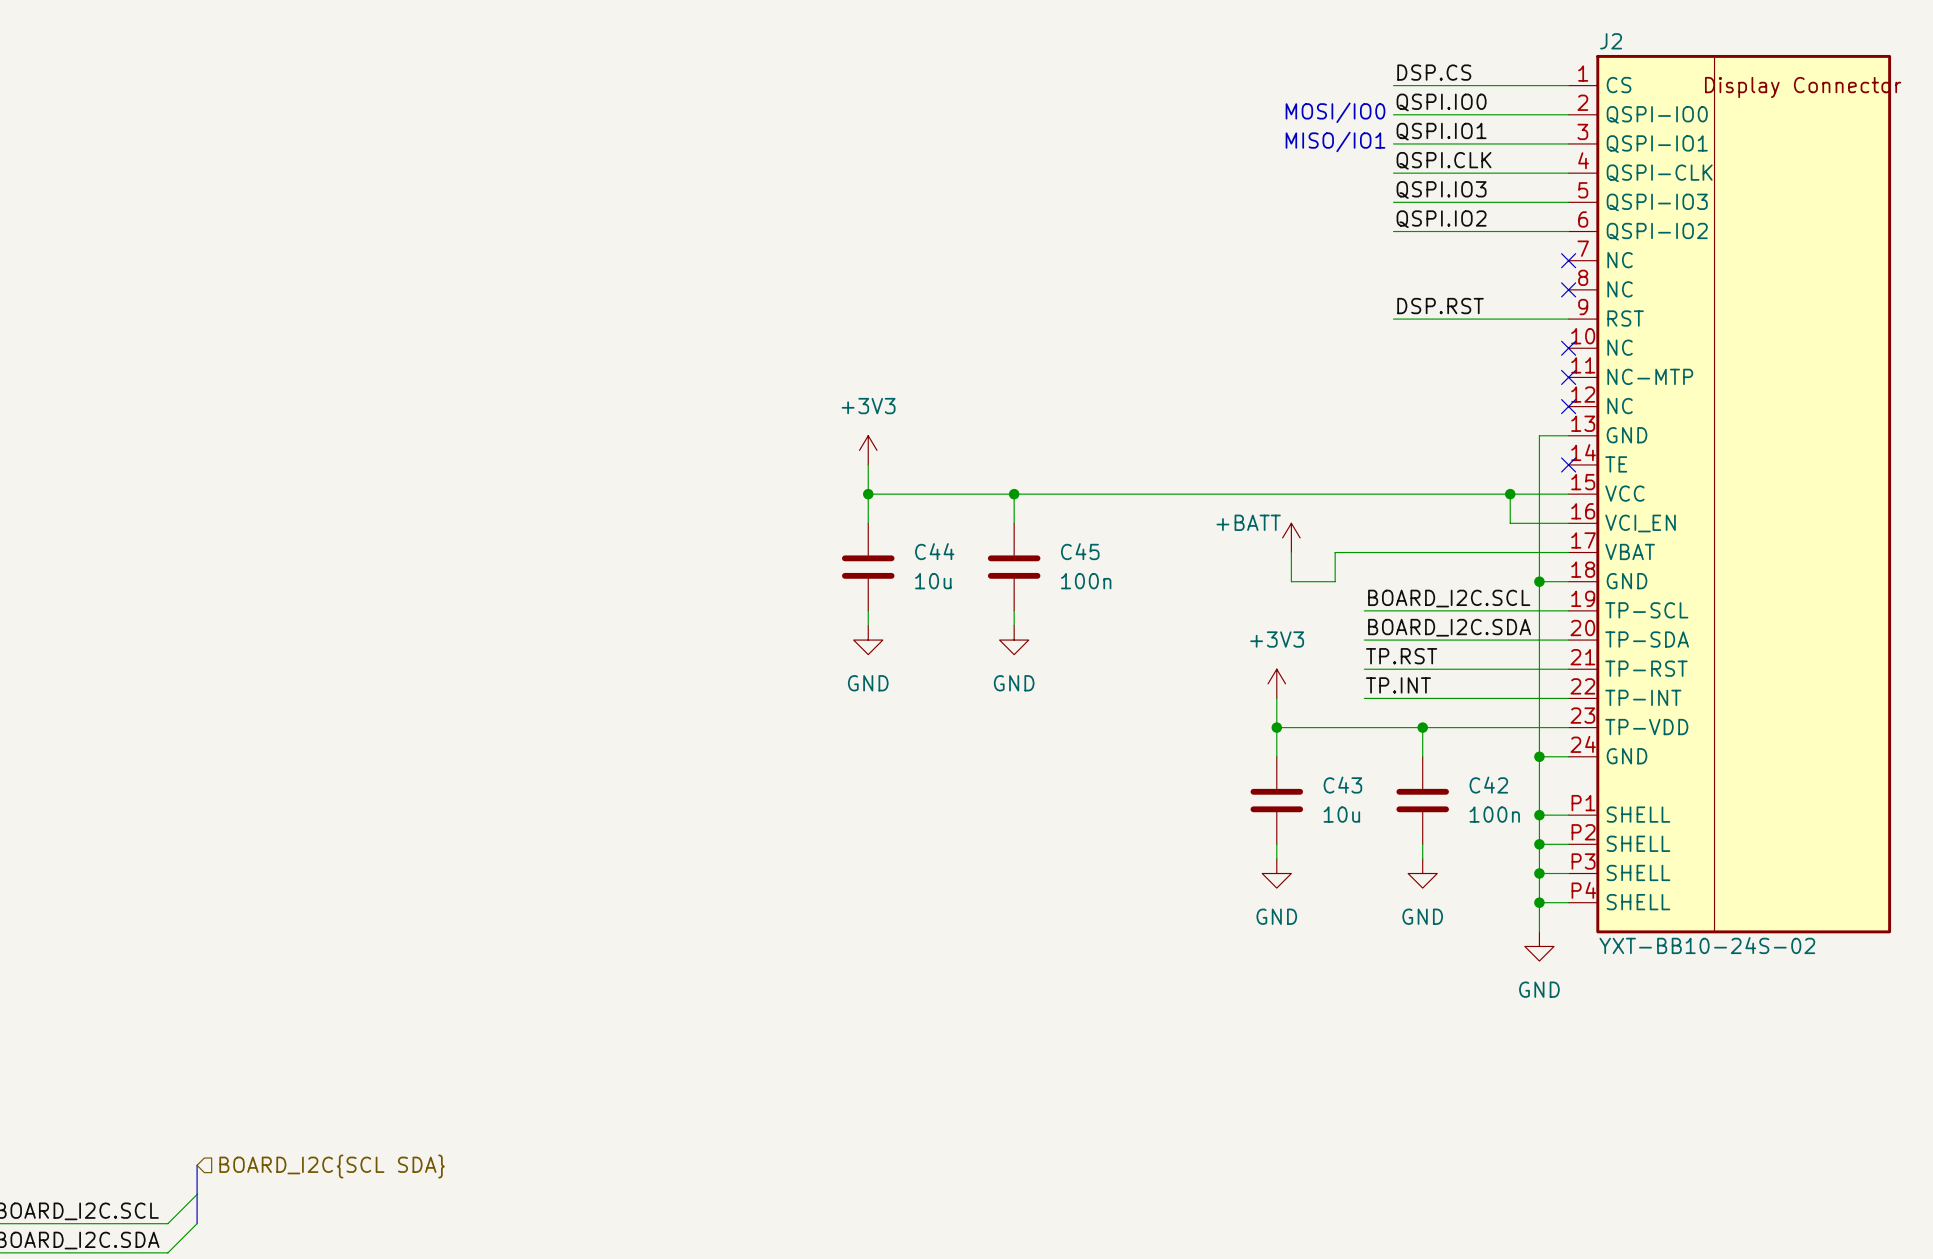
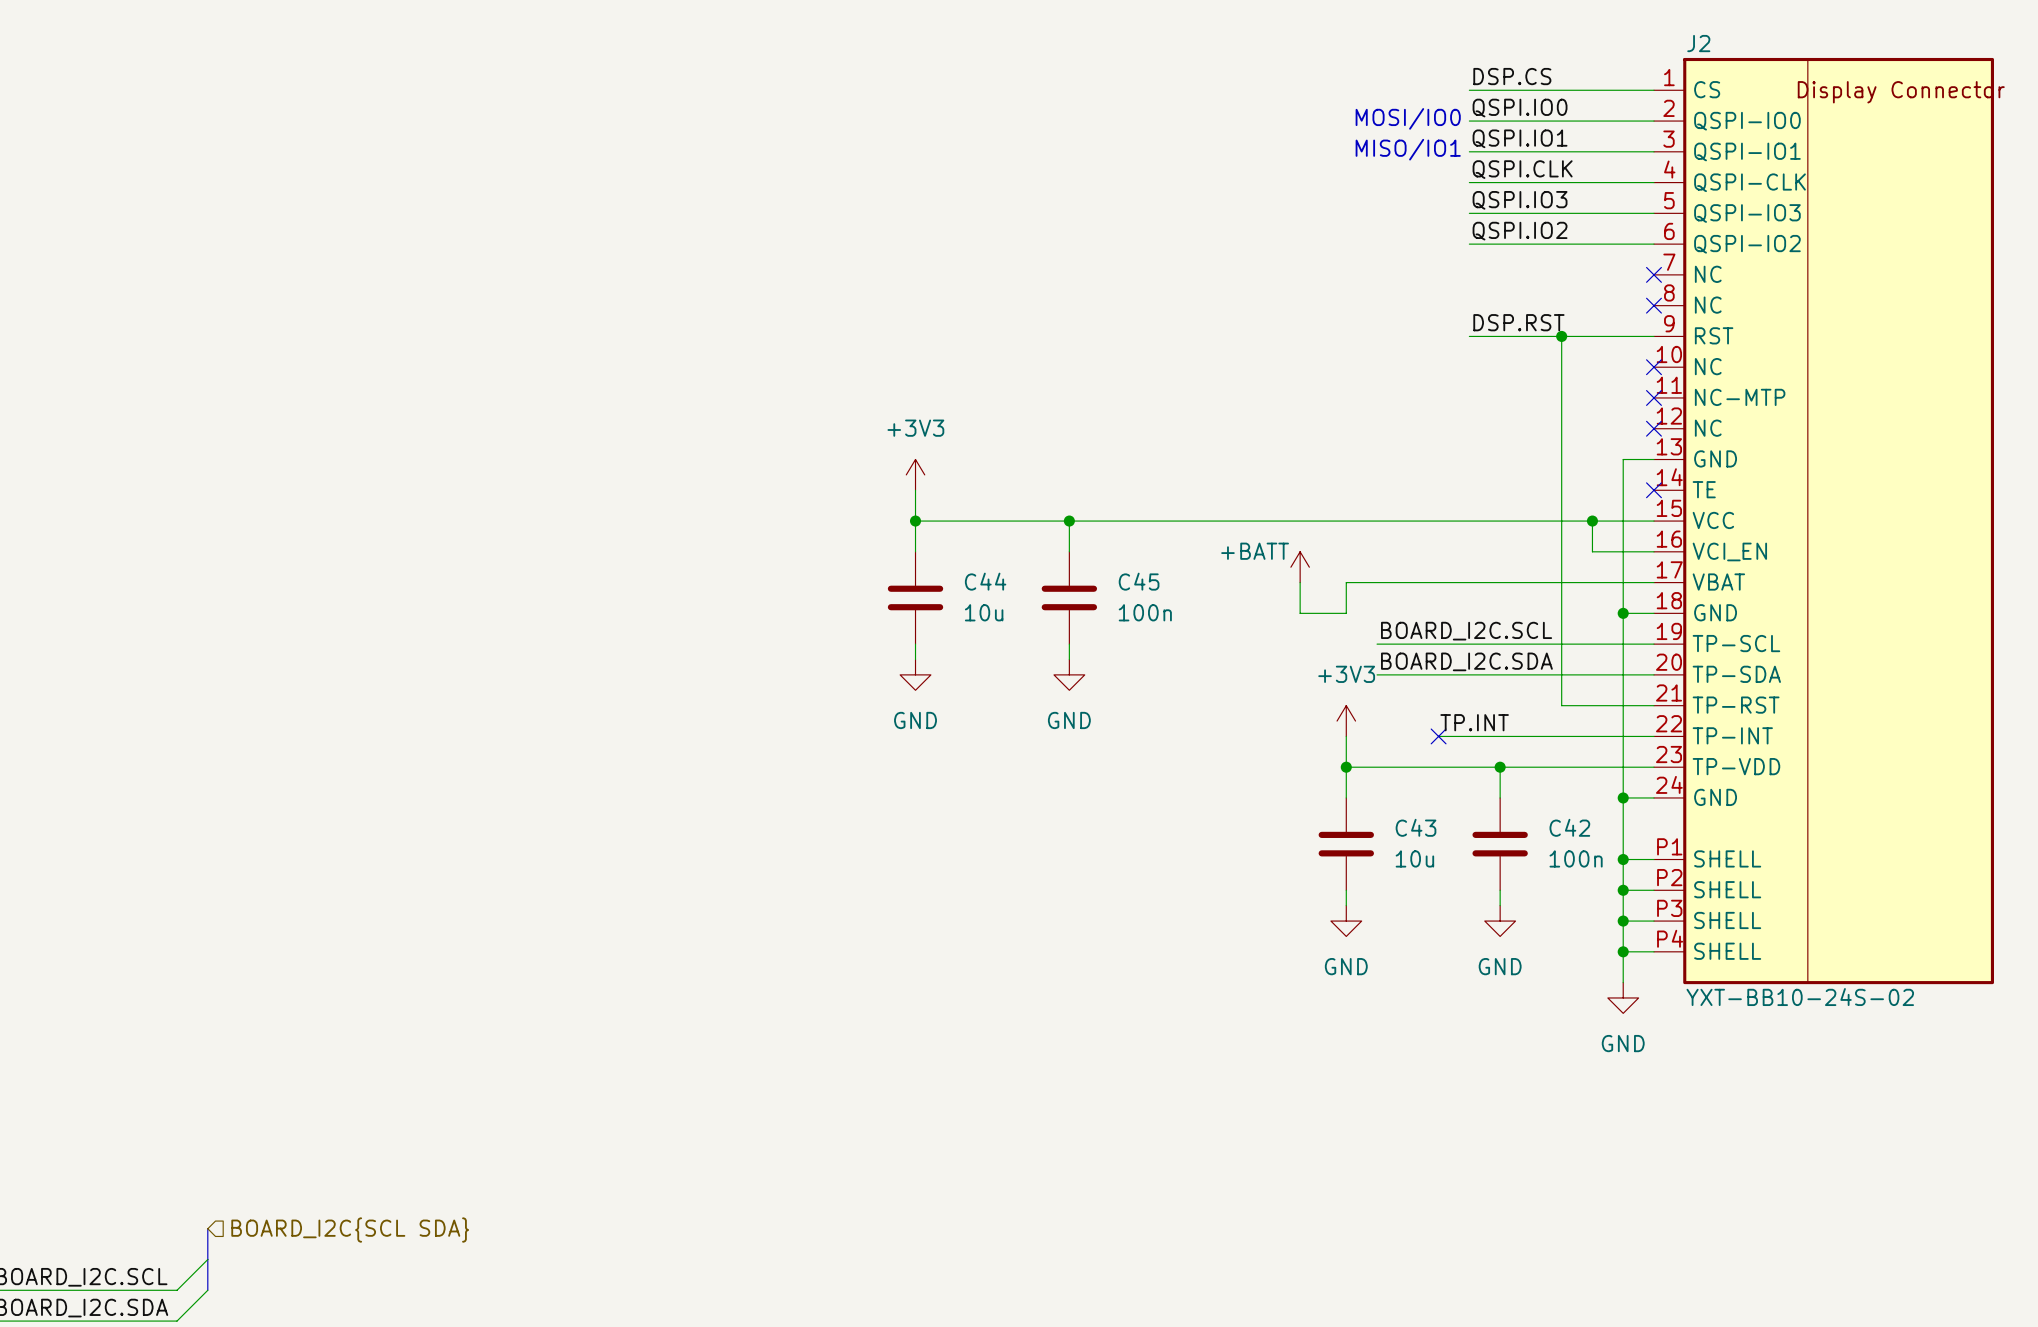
junction: none -> (1561, 336)
power symbol position: +BATT (1291, 537) -> +BATT (1300, 567)
wire: (1291, 552) (1291, 581) (1335, 581) (1335, 552) -> (1300, 582) (1300, 613) (1346, 613) (1346, 582) (1407, 582)
label position: BOARD_I2C.SCL (1449, 598) -> BOARD_I2C.SCL (1466, 631)
wire: none -> (1377, 644) (1438, 644)
label position: BOARD_I2C.SDA (1449, 627) -> BOARD_I2C.SDA (1466, 661)
wire: none -> (1377, 674) (1438, 674)
label: TP.RST (1401, 656) -> none
wire: (1364, 669) (1481, 669) -> (1561, 336) (1561, 705)
no-connect mark: none -> (1438, 736)

